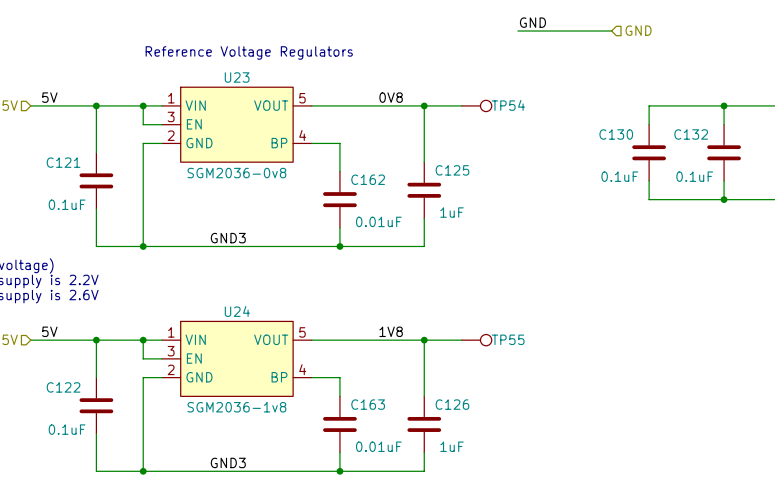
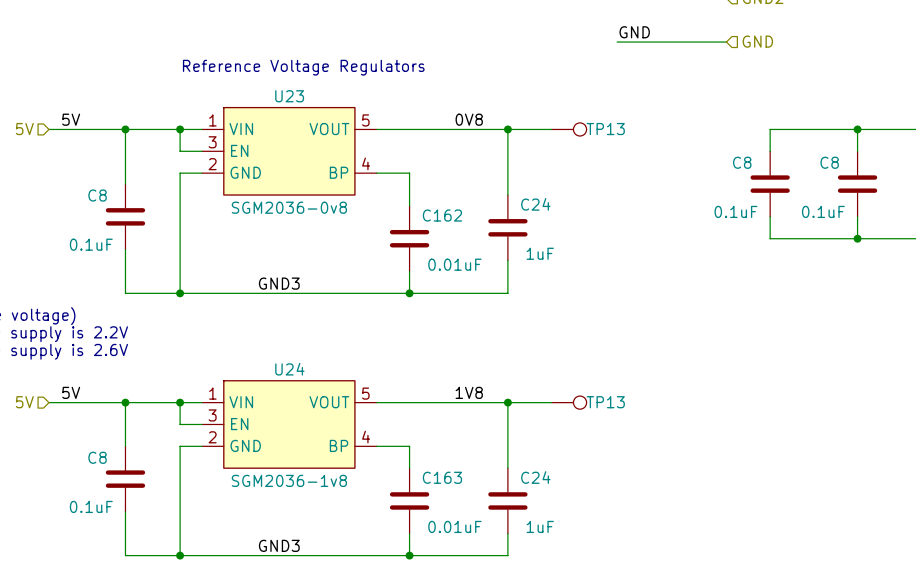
TP54 name: TP54 (508, 105) -> TP13 (605, 129)
C130 name: C130 (616, 134) -> C8 (742, 162)
C132 name: C132 (691, 134) -> C8 (829, 162)
C121 name: C121 (63, 162) -> C8 (97, 195)
C125 name: C125 (452, 170) -> C24 (535, 204)
TP55 name: TP55 (508, 339) -> TP13 (605, 402)
C122 name: C122 (63, 387) -> C8 (97, 457)
C126 name: C126 (452, 404) -> C24 (535, 477)

